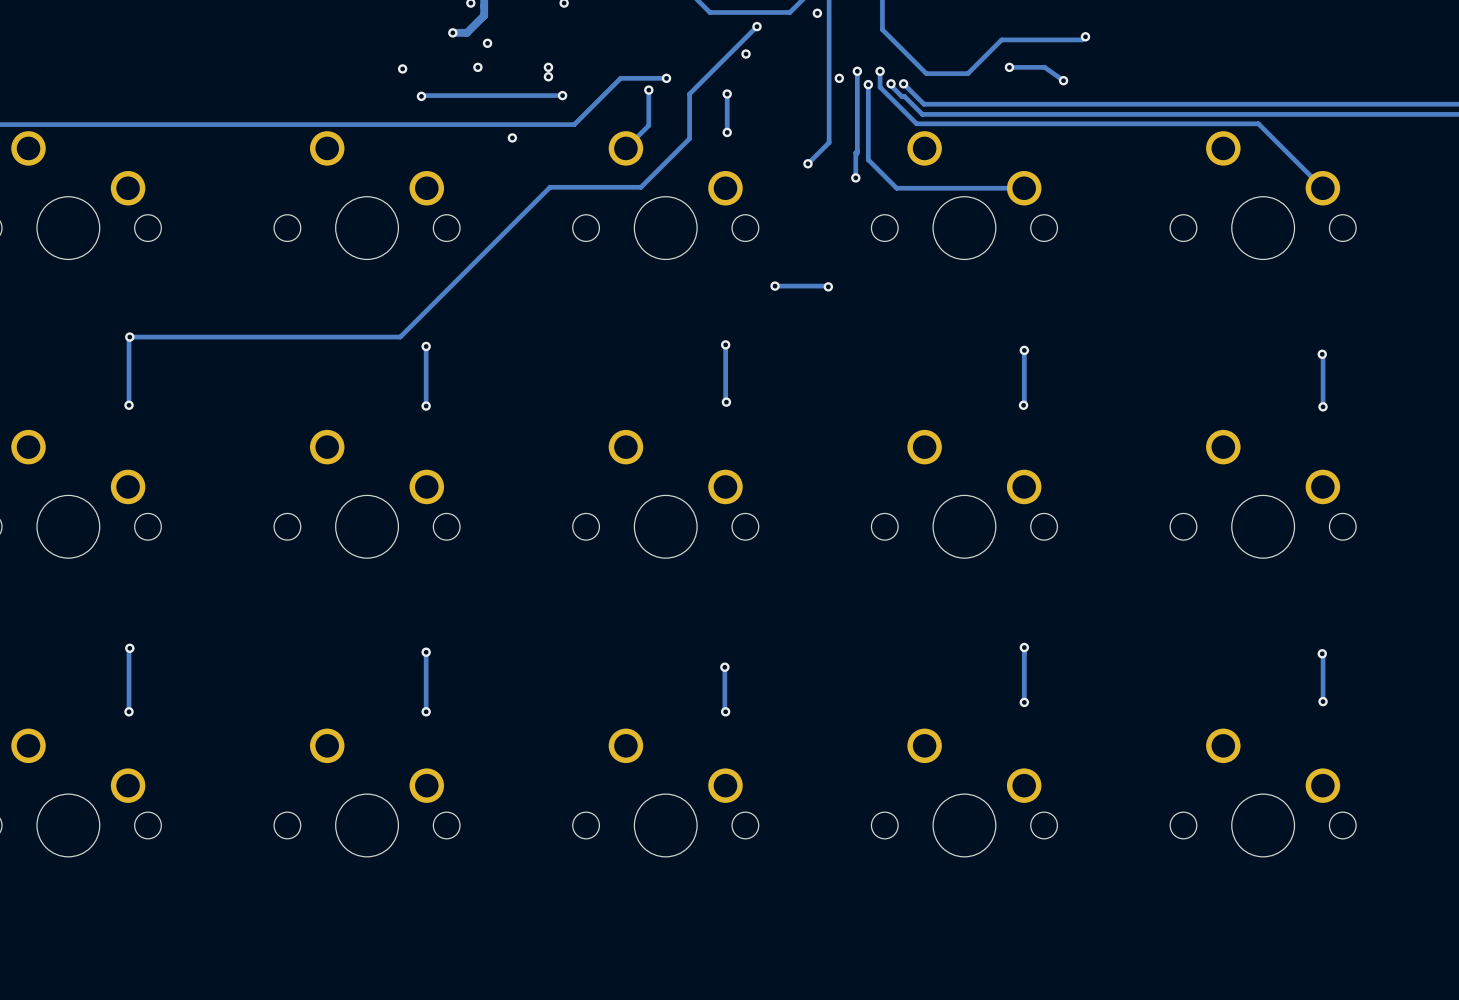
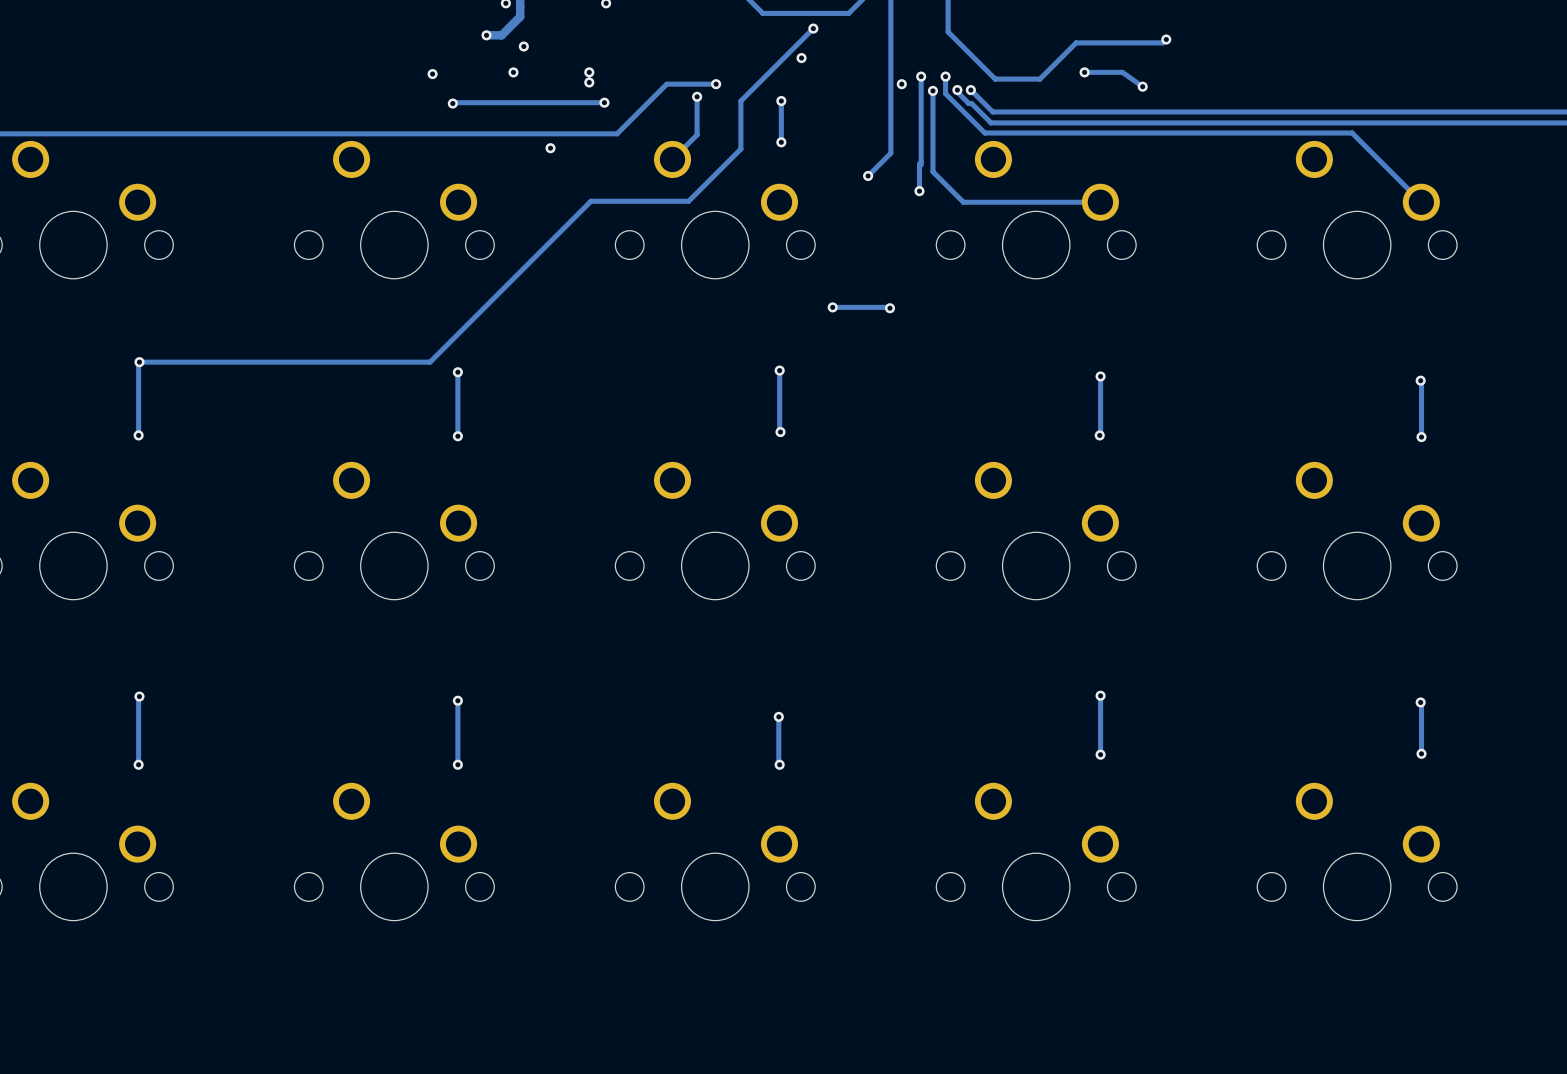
via: (817, 13) -> none

